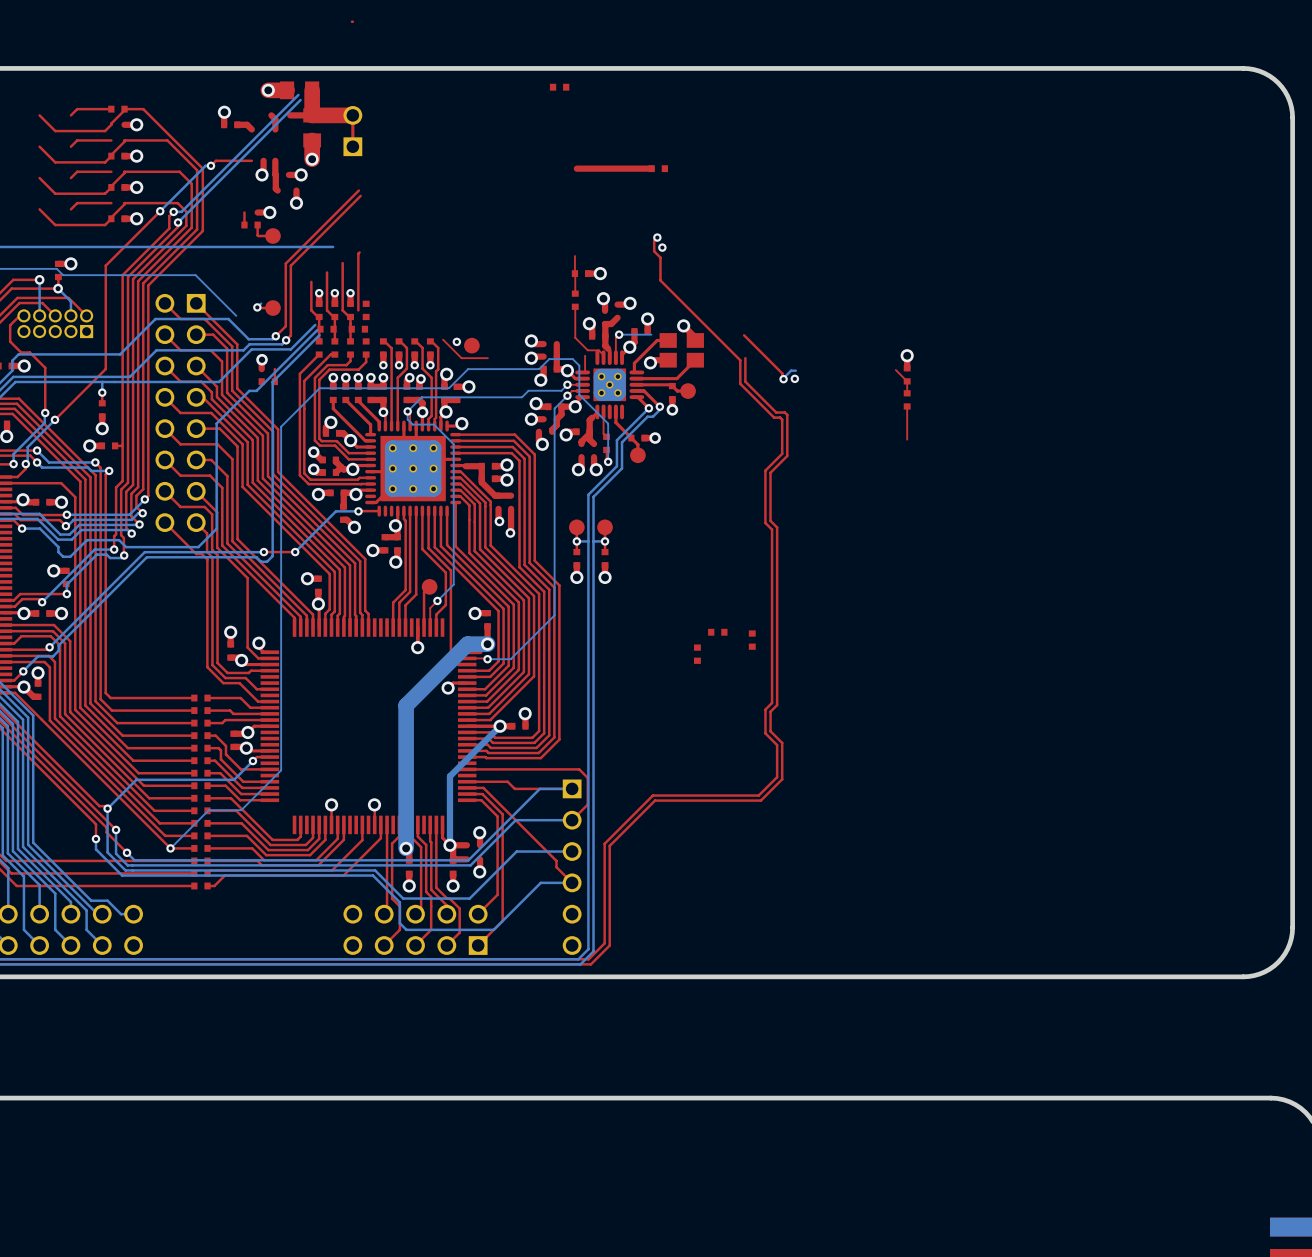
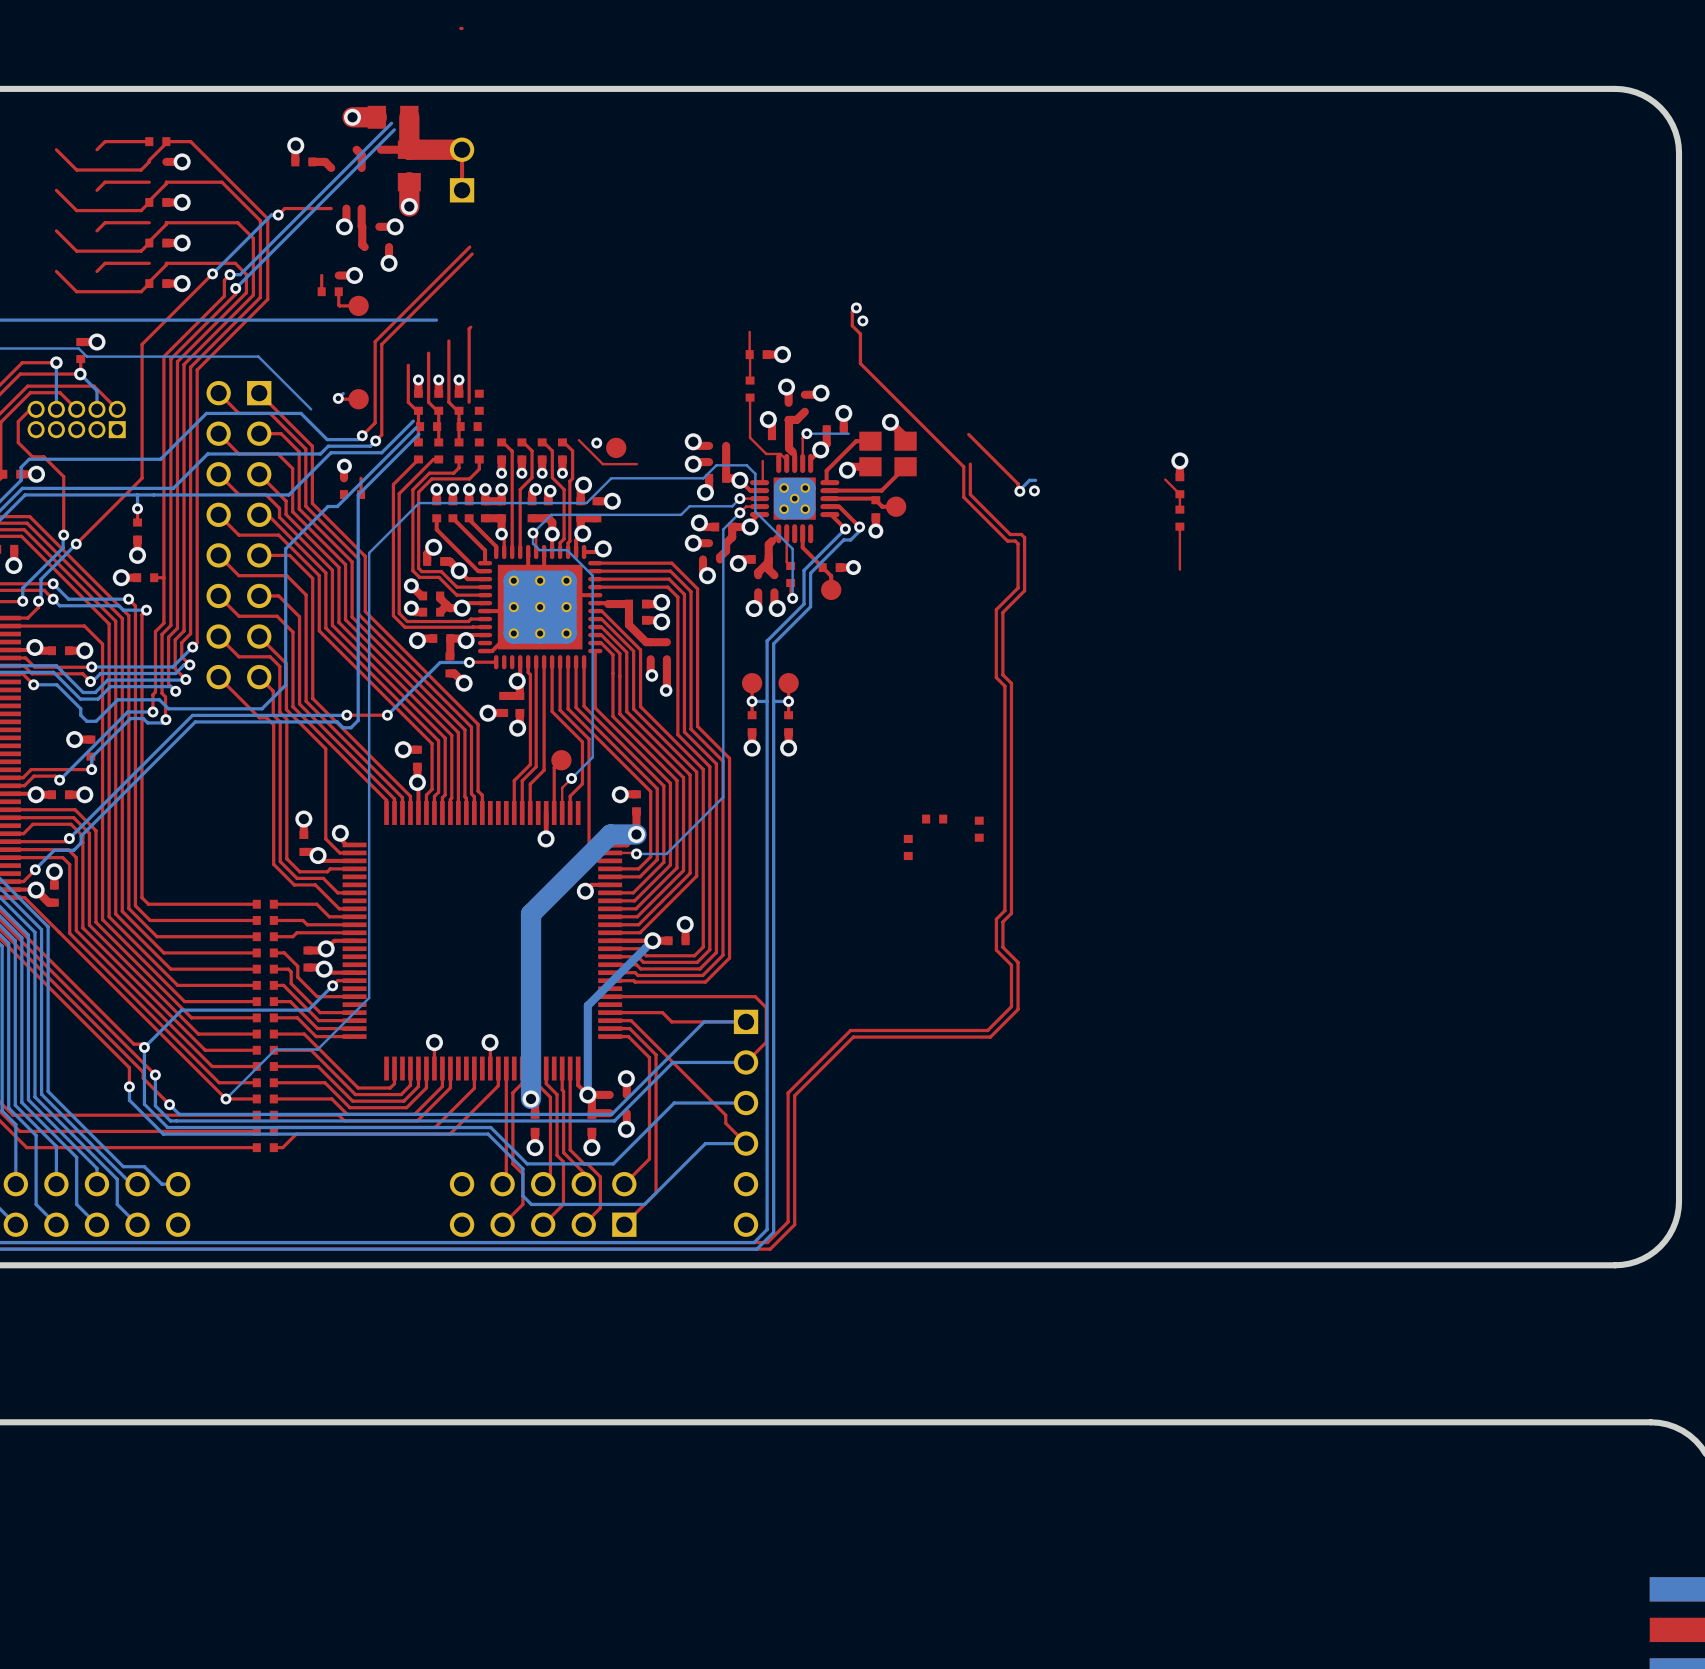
part: (559, 87) -> none
top track: (651, 168) (576, 168) -> none
part: (658, 168) -> none

